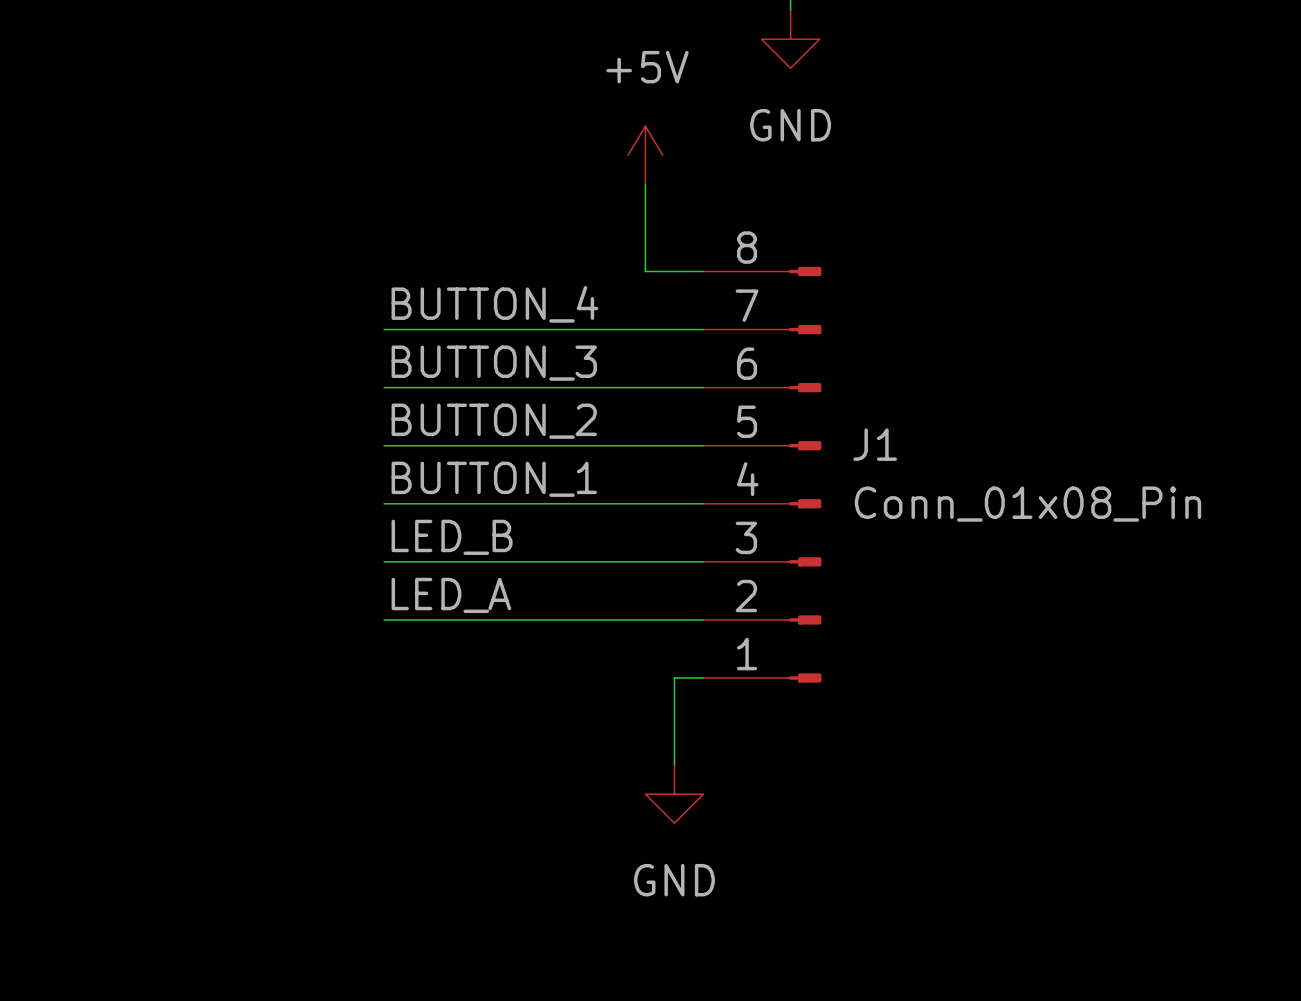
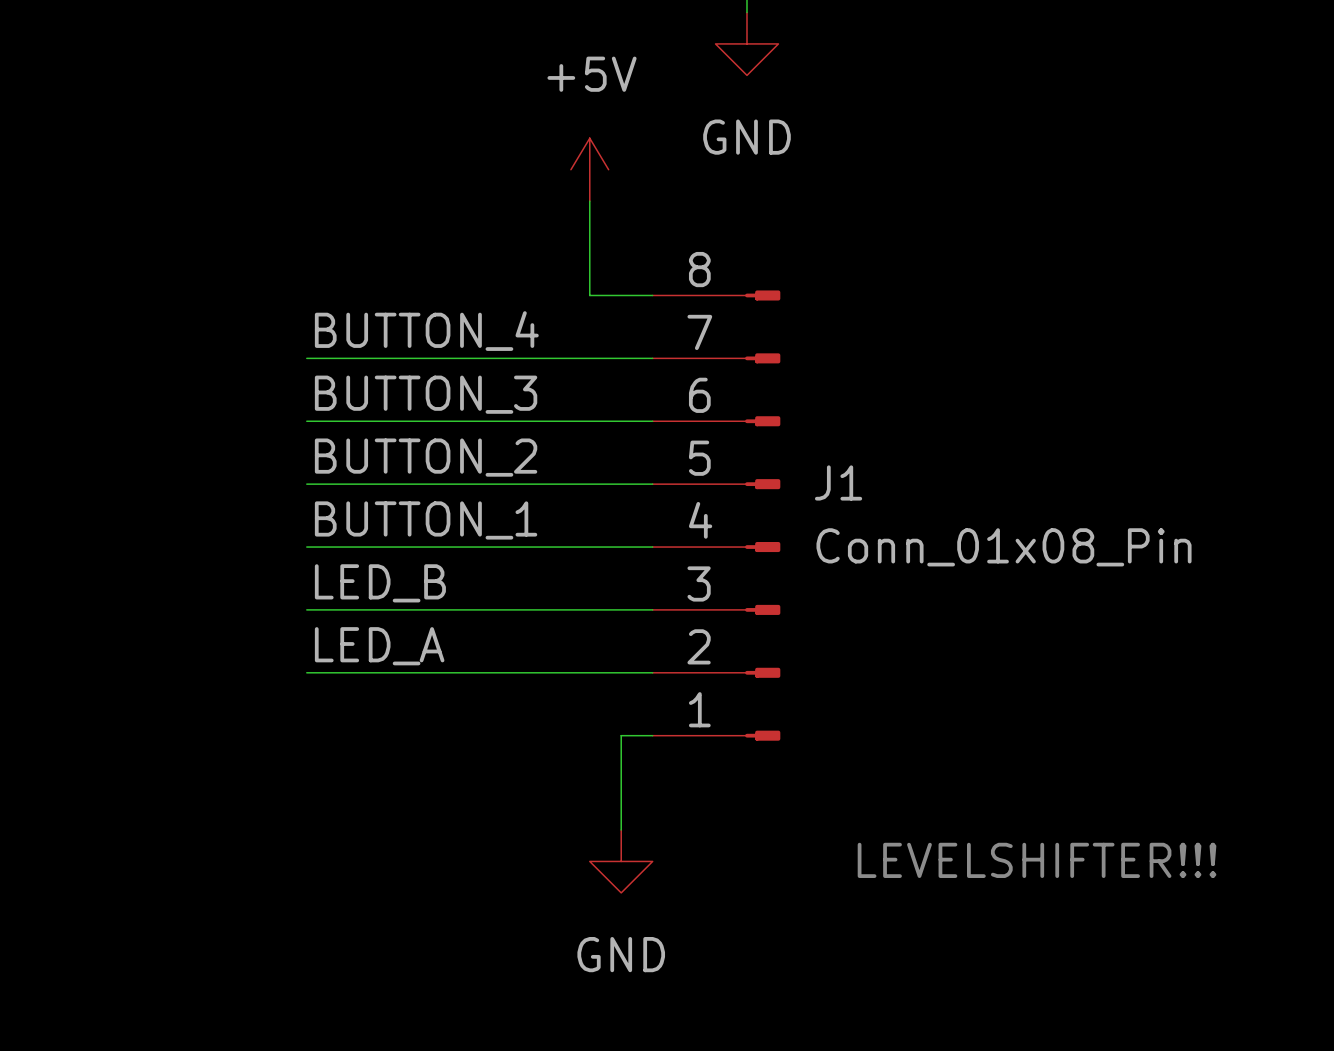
text: none -> LEVELSHIFTER!!! (1037, 860)

